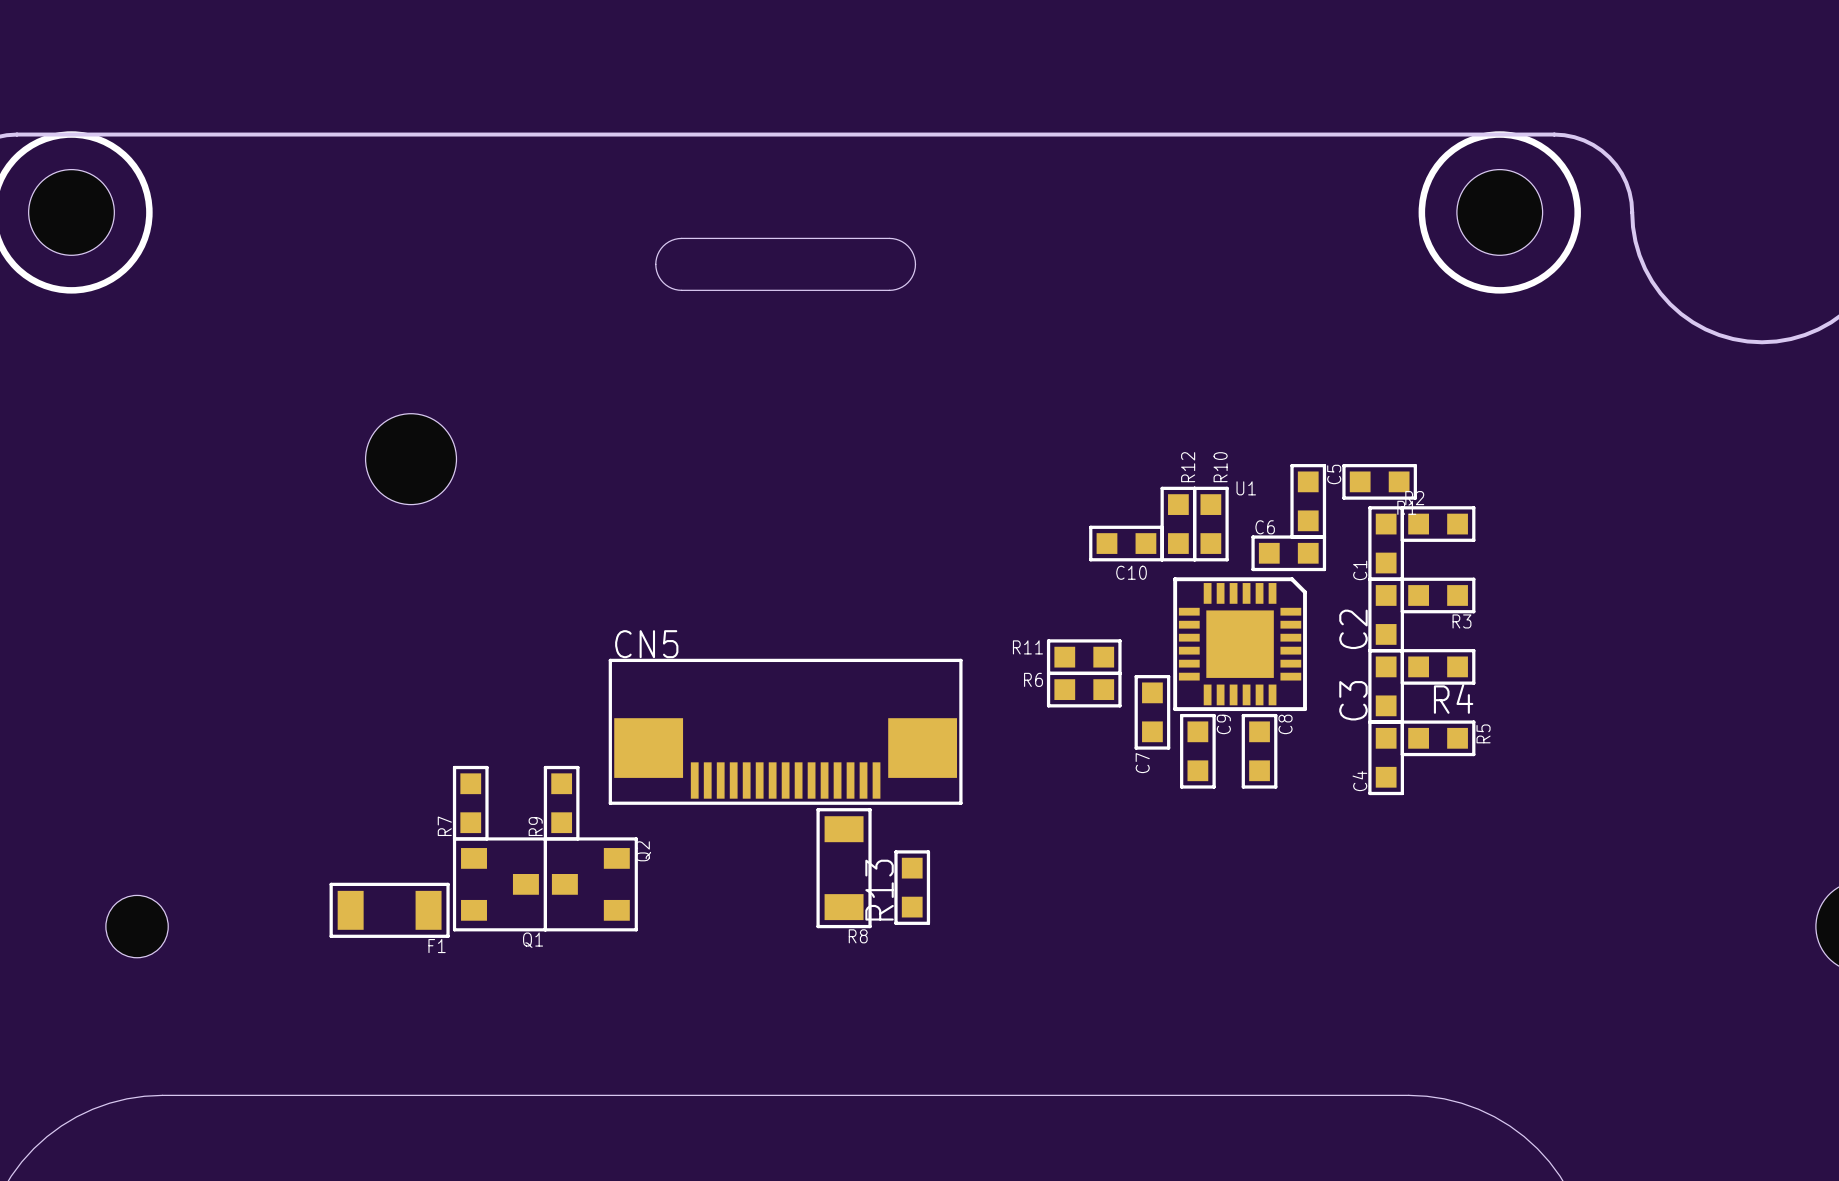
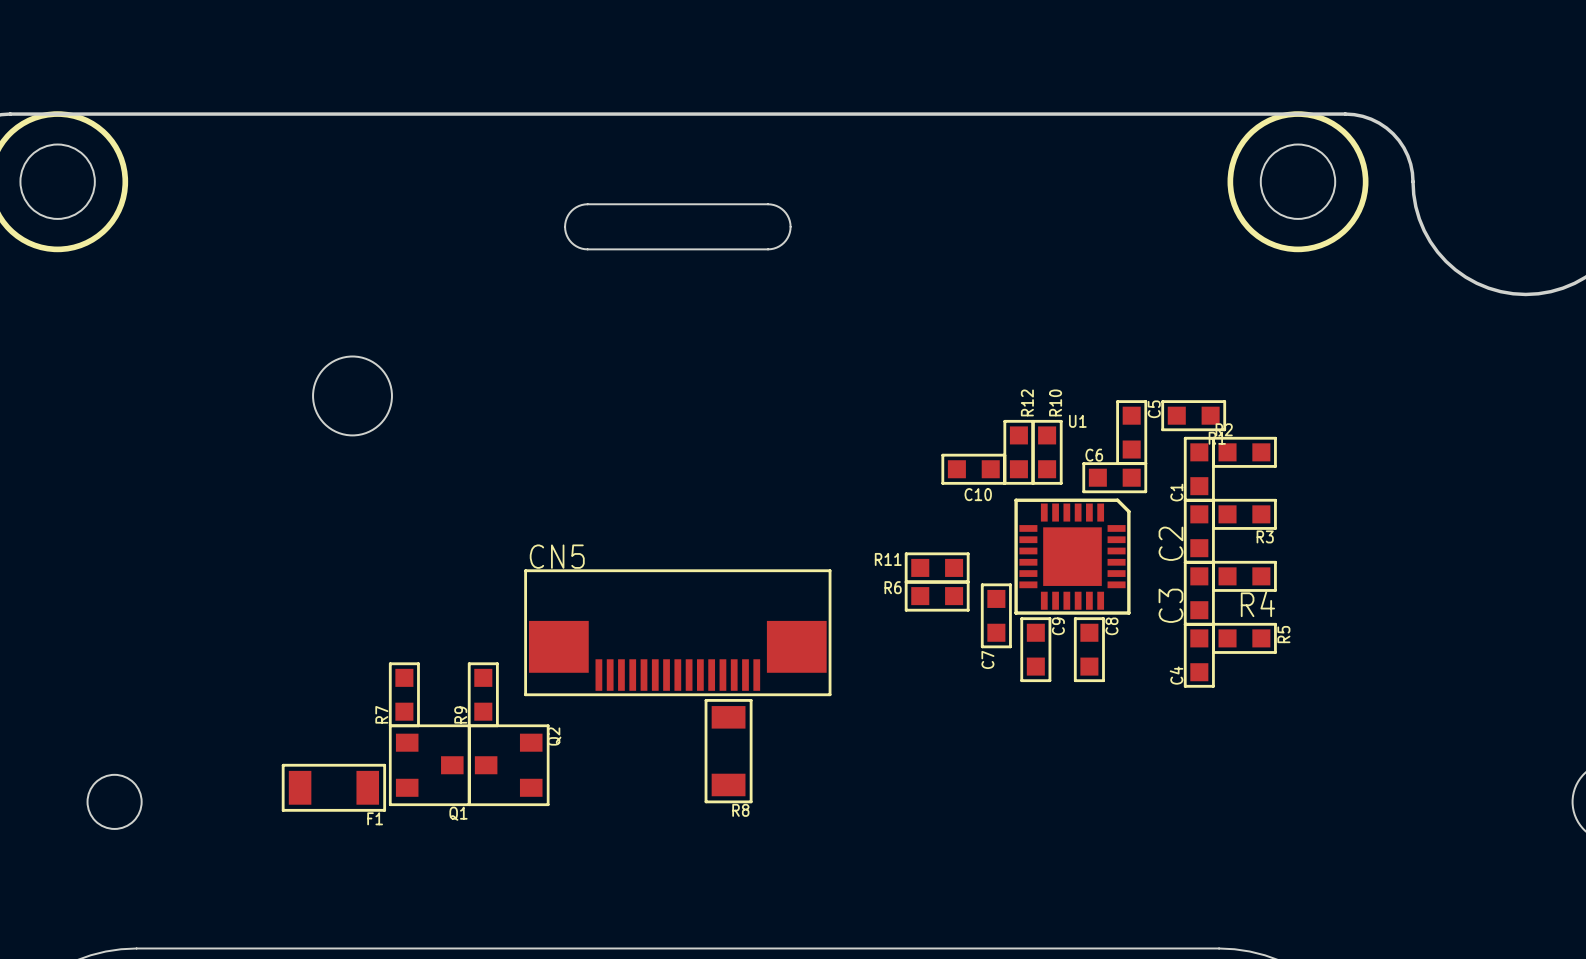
R13: (912, 887) -> none

